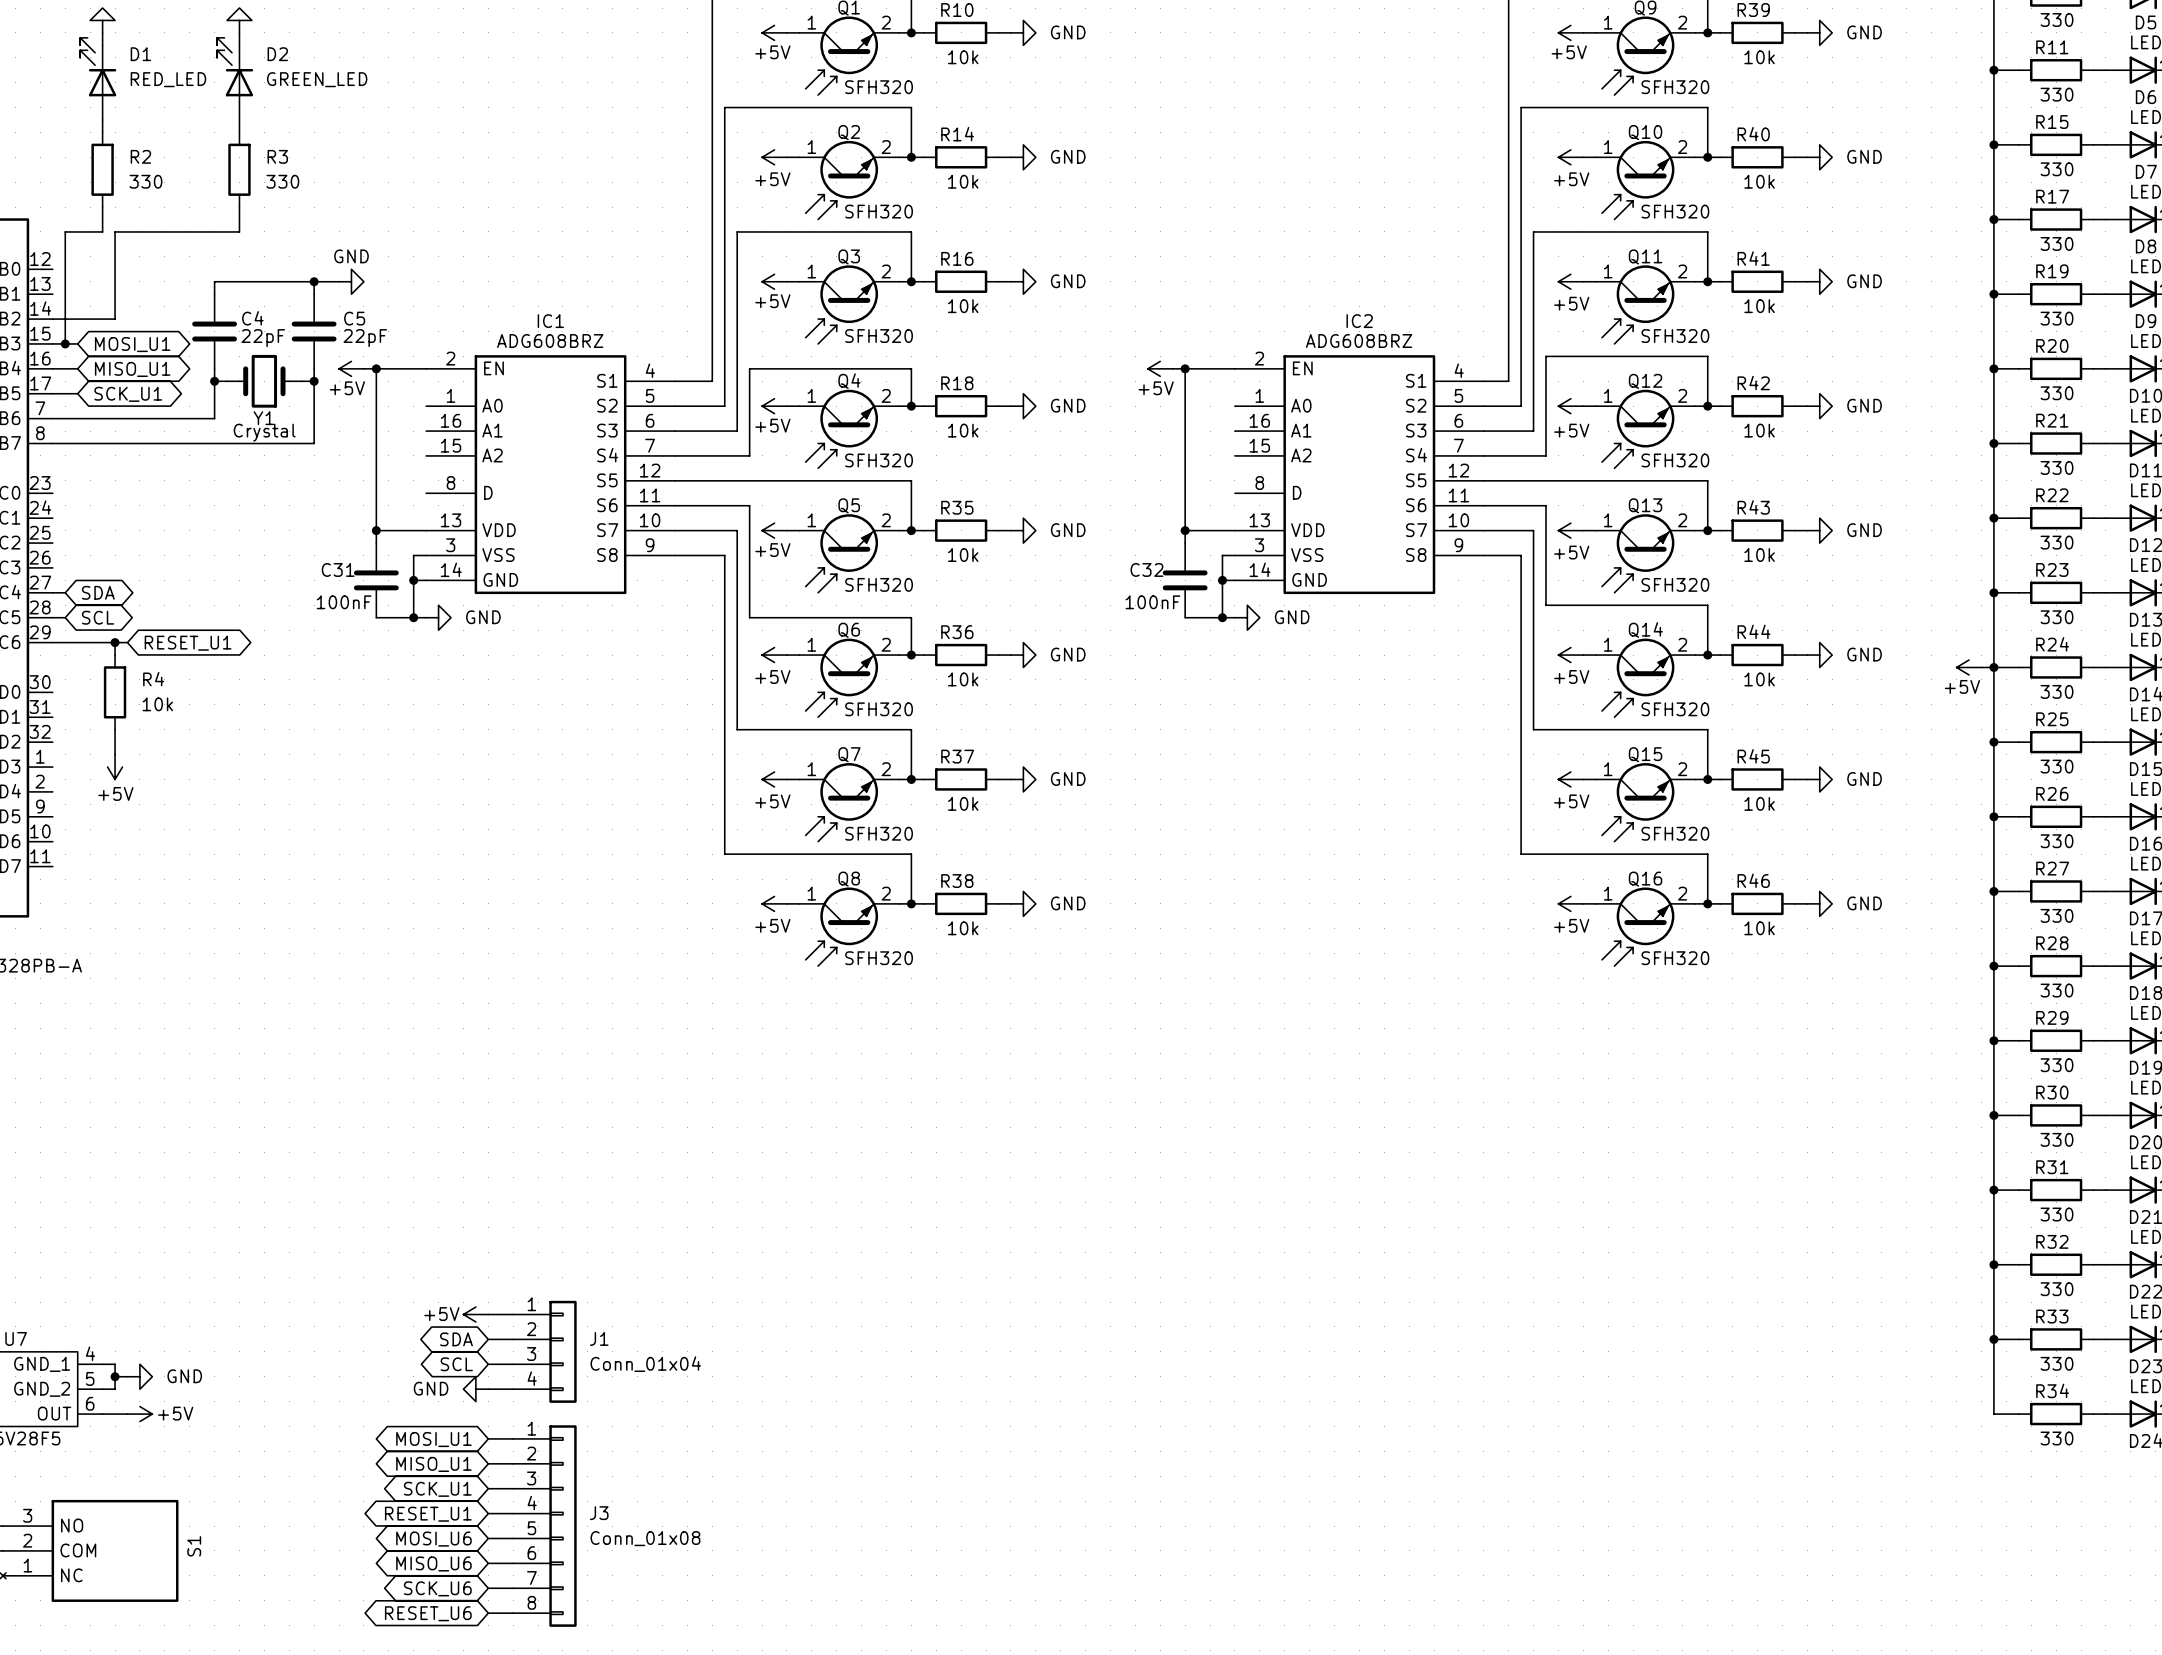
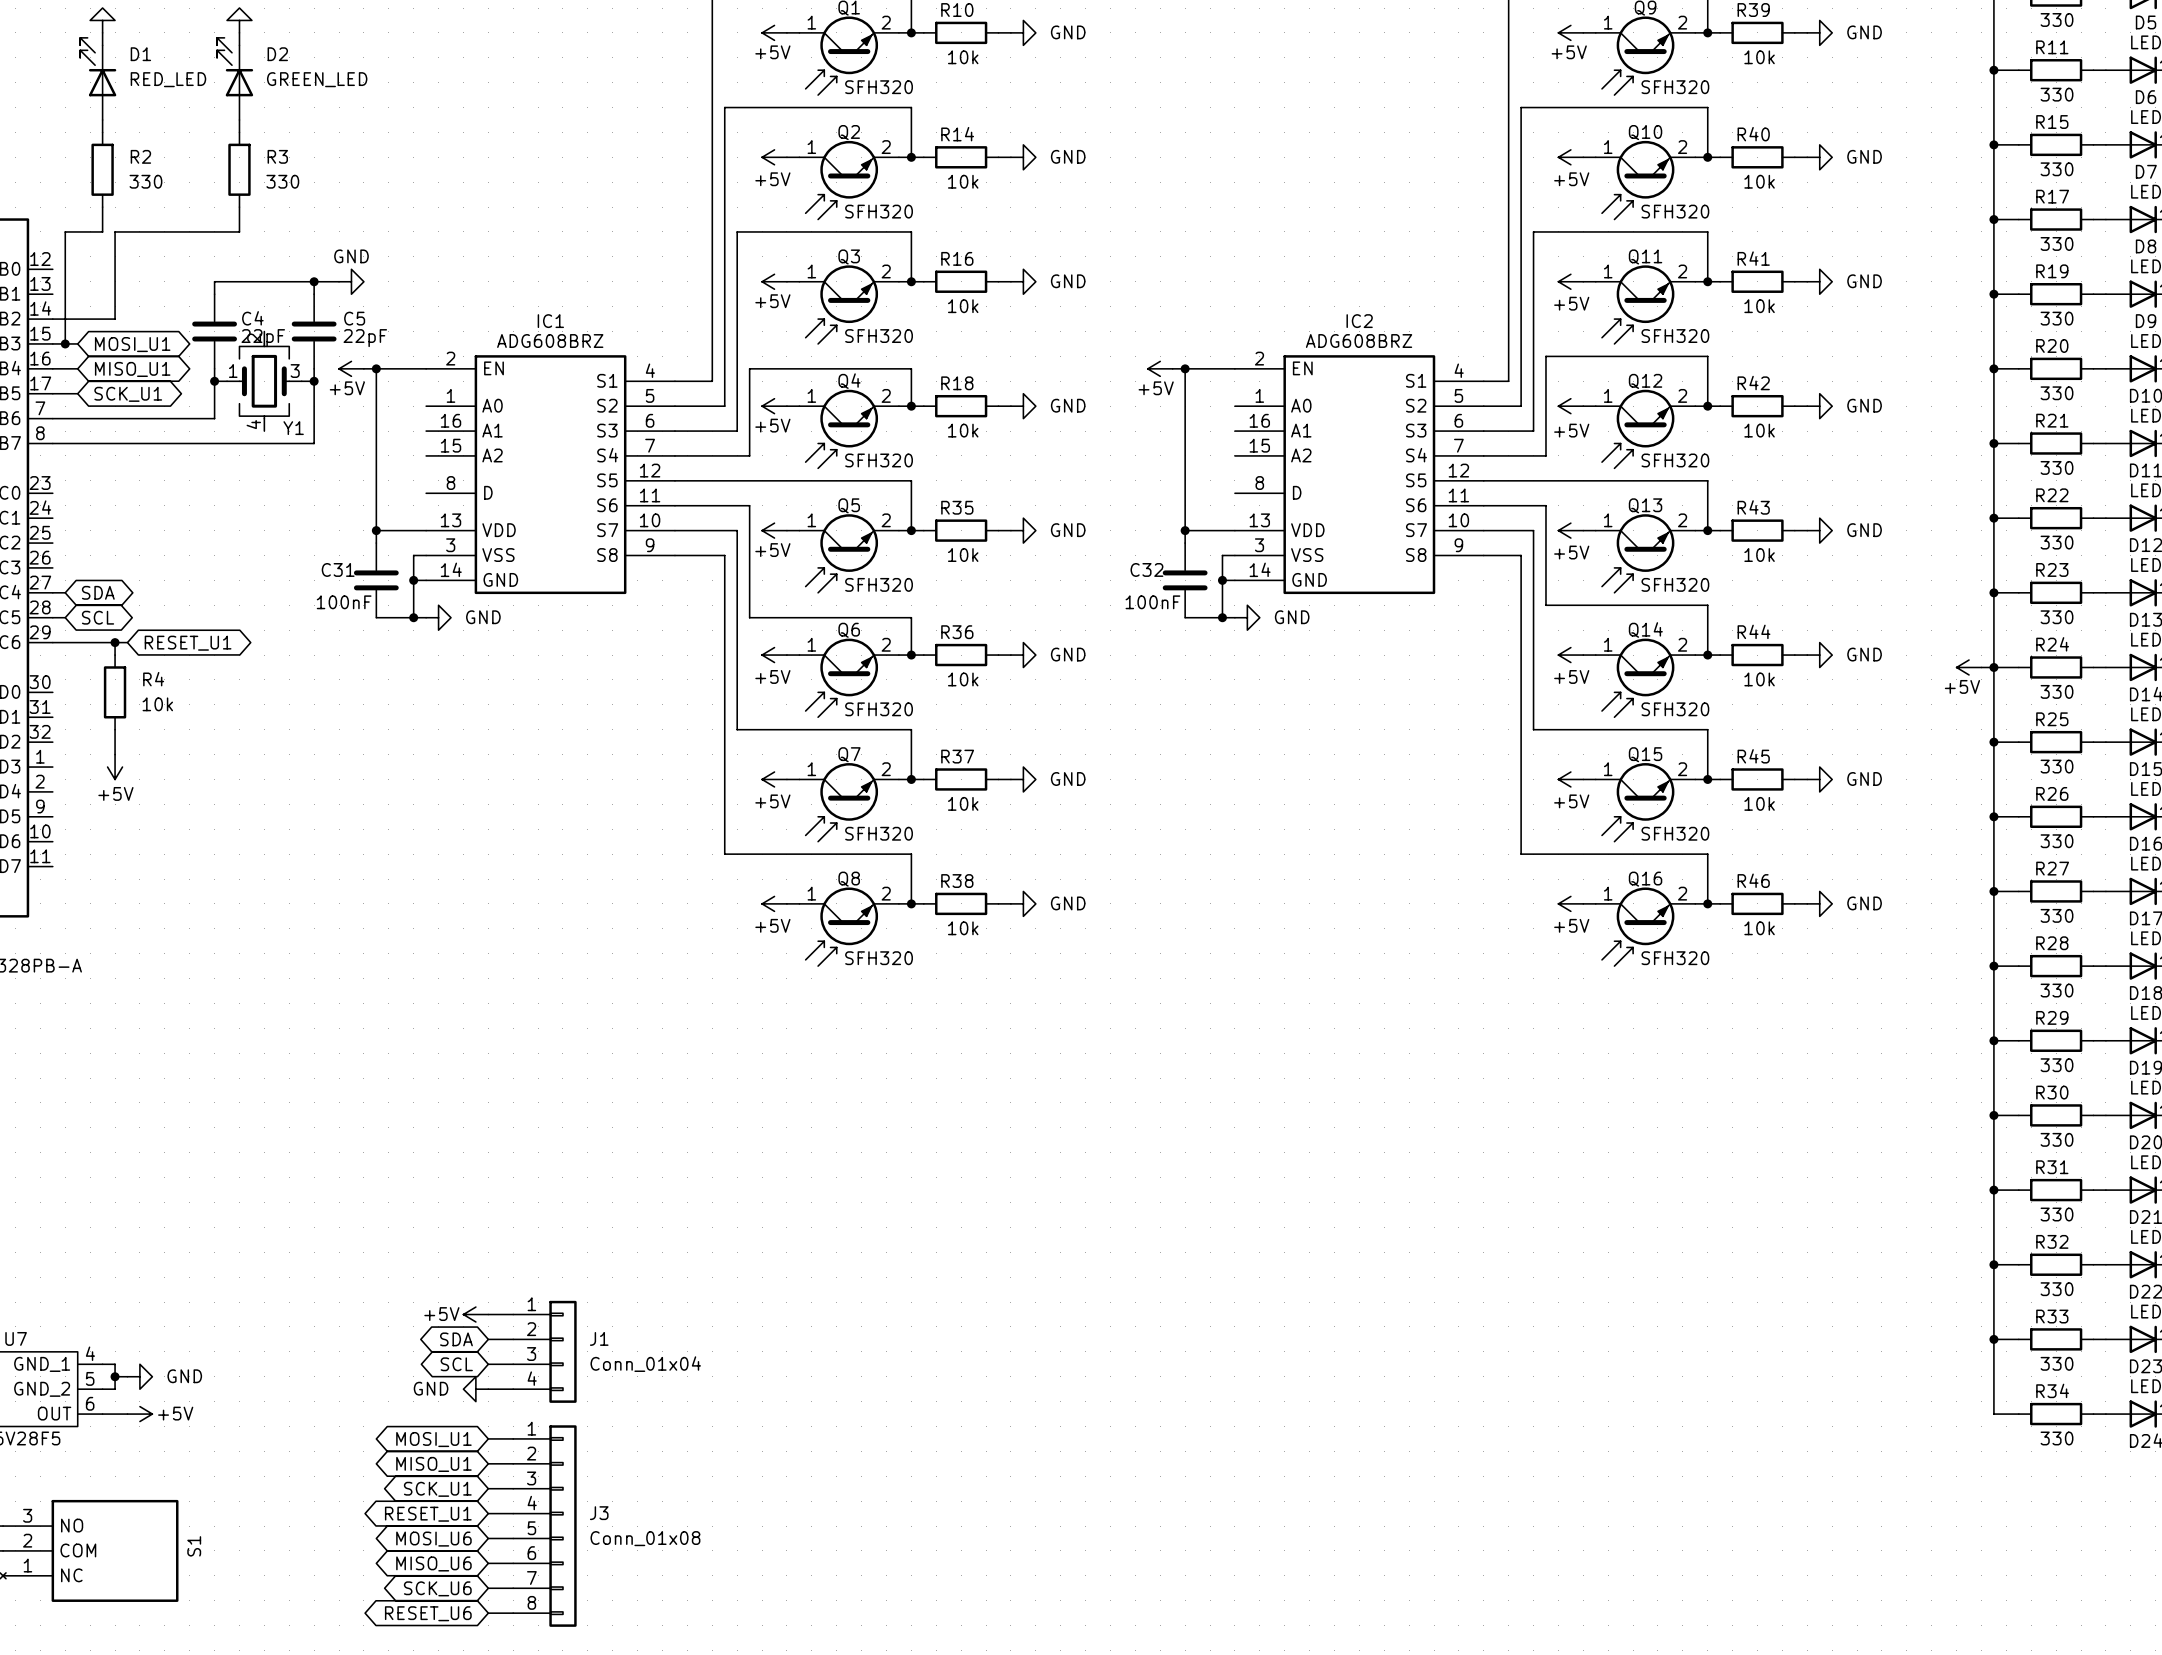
Y1 symbol: [227, 354, 302, 408] -> [227, 331, 302, 432]
Y1 name position: Y1 (263, 418) -> Y1 (293, 428)
Y1 value: Crystal (264, 432) -> none

